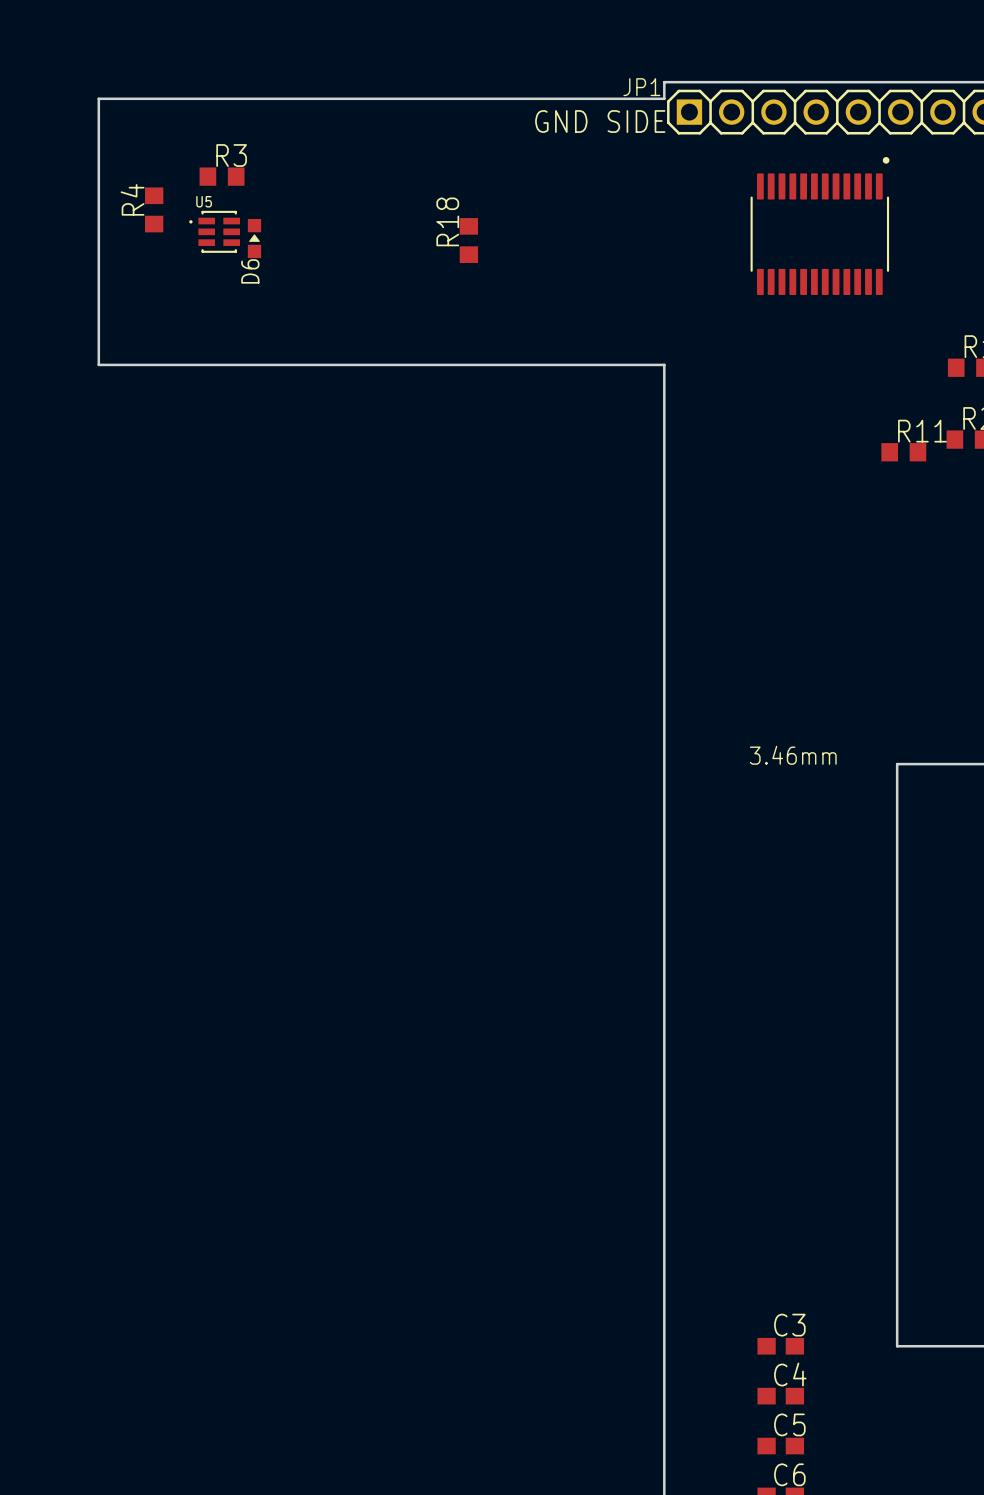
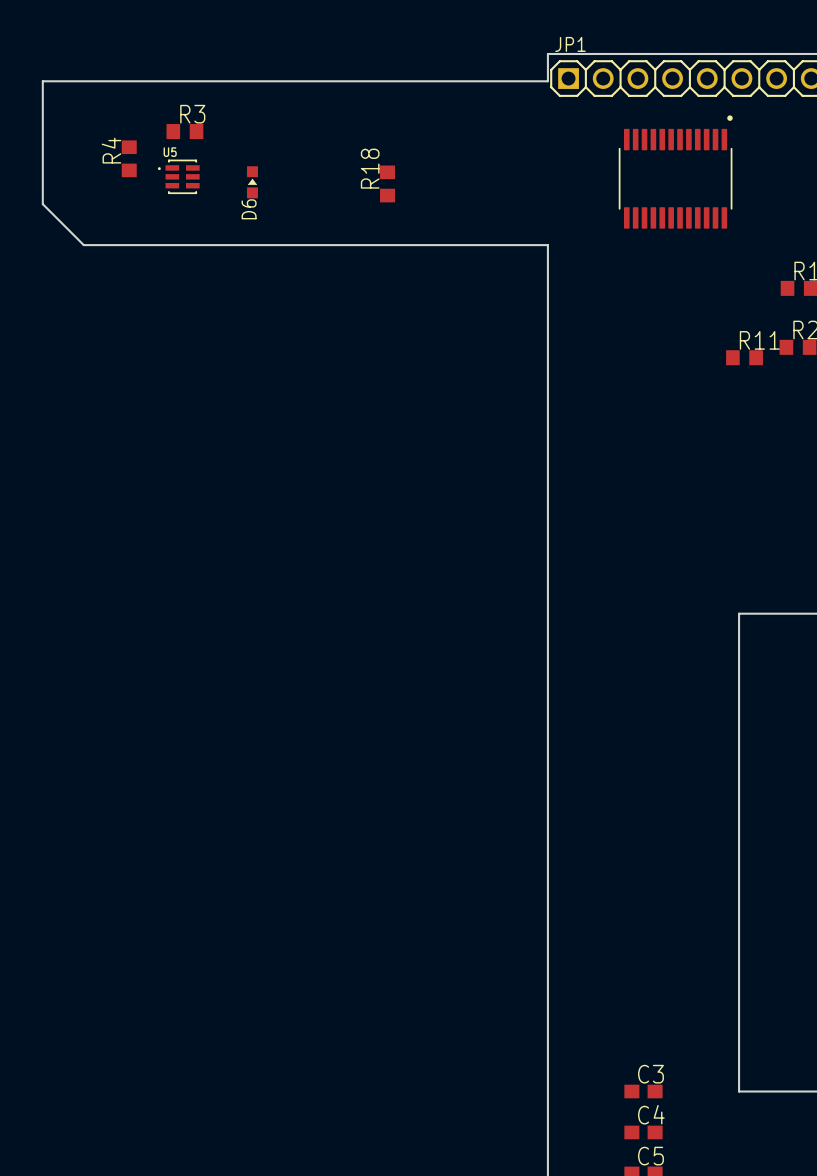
JP1 name position: JP1 (641, 87) -> JP1 (570, 44)
board edge: (664, 98) (98, 98) (98, 364) (664, 364) -> (547, 67) (547, 81) (42, 81) (42, 204) (83, 245) (547, 245) (547, 286)
text: GND SIDE (600, 121) -> none
D6 position: (254, 238) -> (252, 182)
text: 3.46mm (793, 755) -> none

